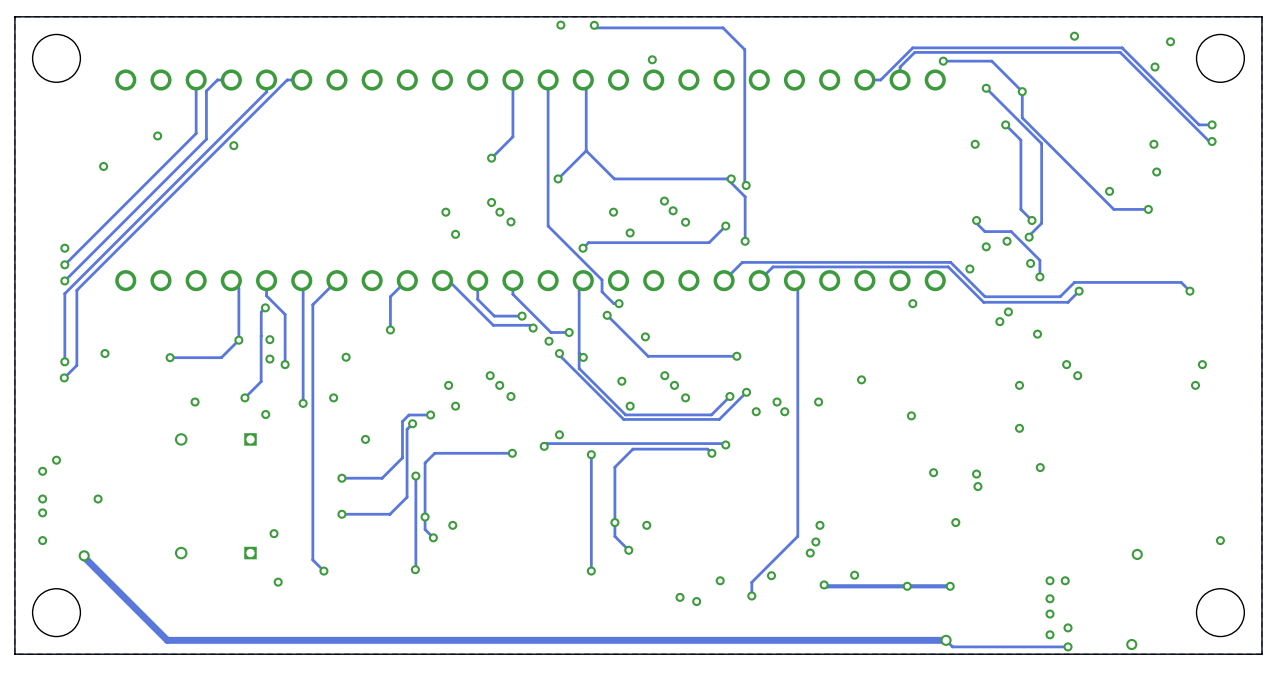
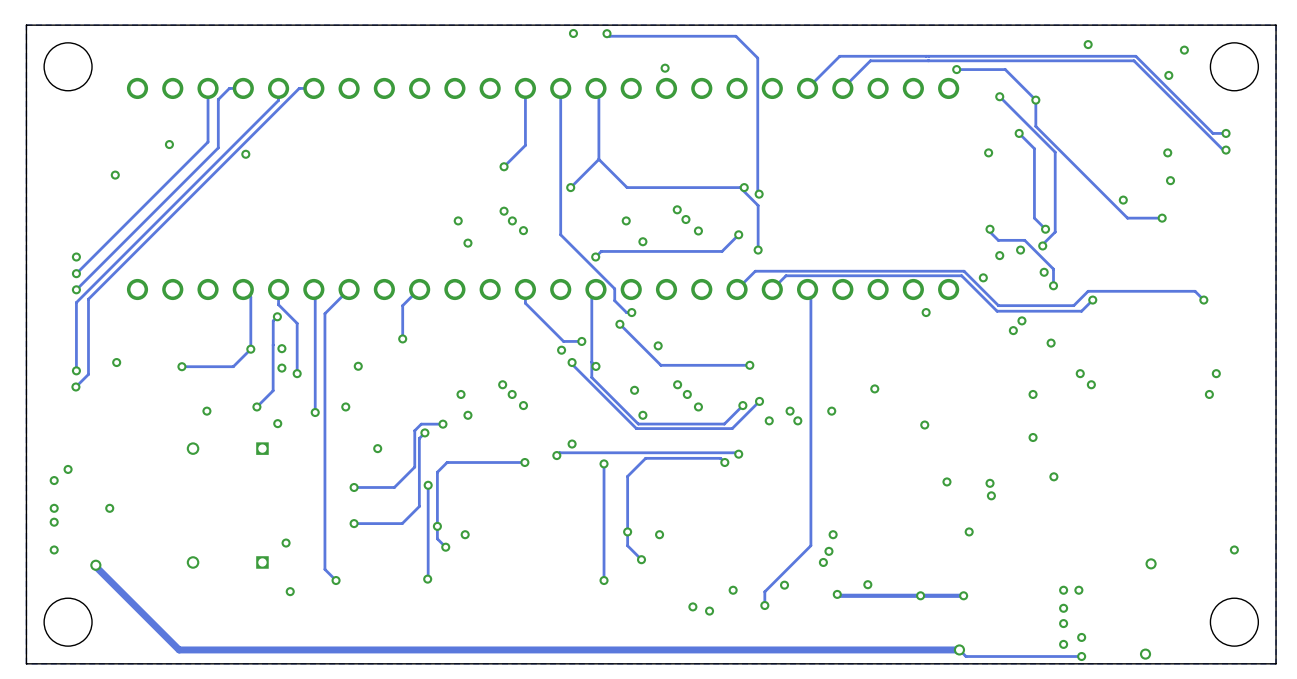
track: (912, 47) (880, 79) (864, 79) -> (926, 56) (839, 56) (807, 88)
track: (914, 52) (900, 67) (900, 79) -> (928, 60) (870, 60) (842, 88)
track: (442, 280) (448, 280) (493, 325) (530, 325) (533, 328) -> none
track: (477, 280) (477, 299) (494, 316) (522, 316) -> none
via: (522, 316) -> none
via: (533, 328) -> none

